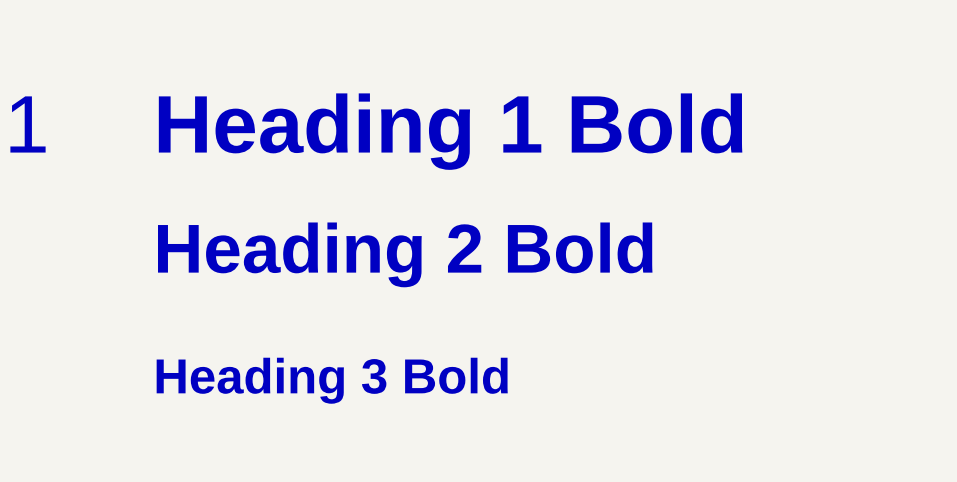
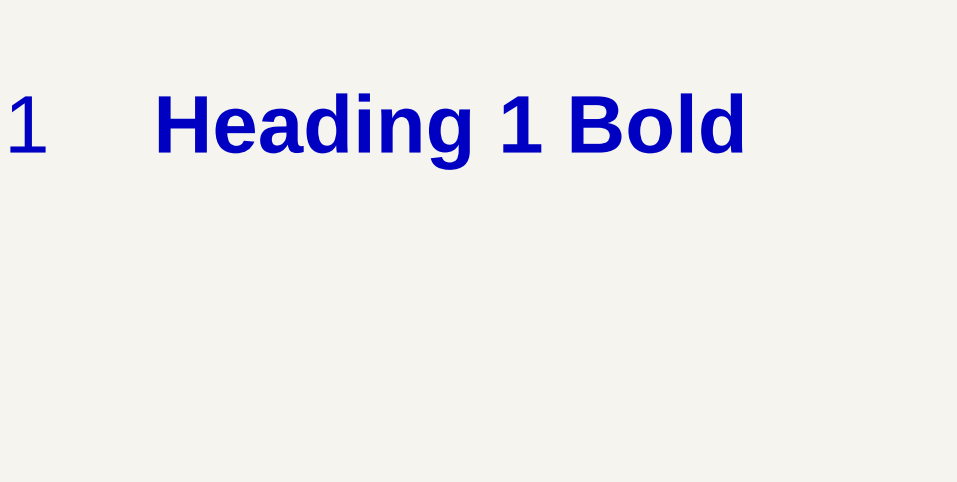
text: Heading 2 Bold (405, 254) -> none
text: Heading 3 Bold (332, 380) -> none

